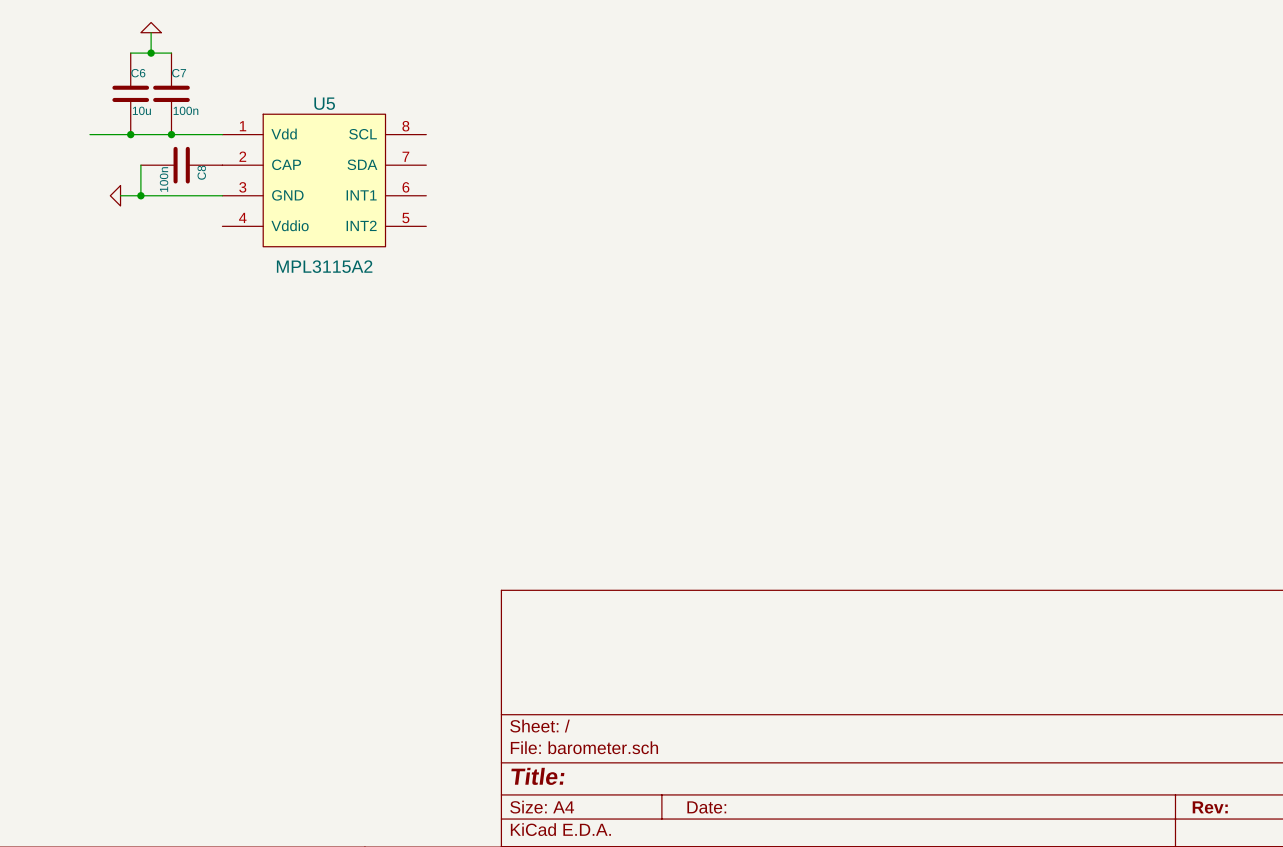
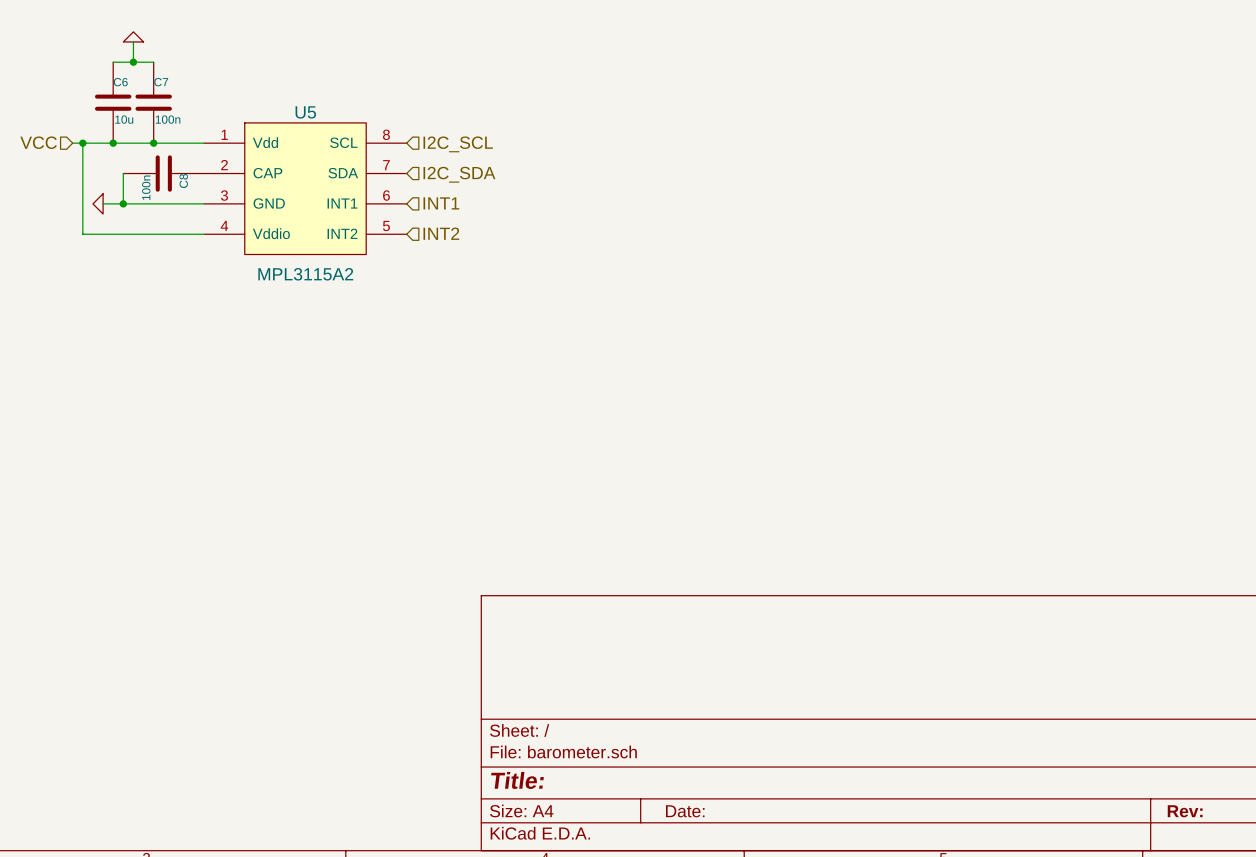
hierarchical label: none -> VCC (38, 142)
wire: none -> (82, 143) (82, 234) (204, 234)
junction: none -> (82, 143)
hierarchical label: none -> I2C_SCL (458, 144)
hierarchical label: none -> I2C_SDA (459, 174)
hierarchical label: none -> INT1 (441, 203)
hierarchical label: none -> INT2 (441, 233)

